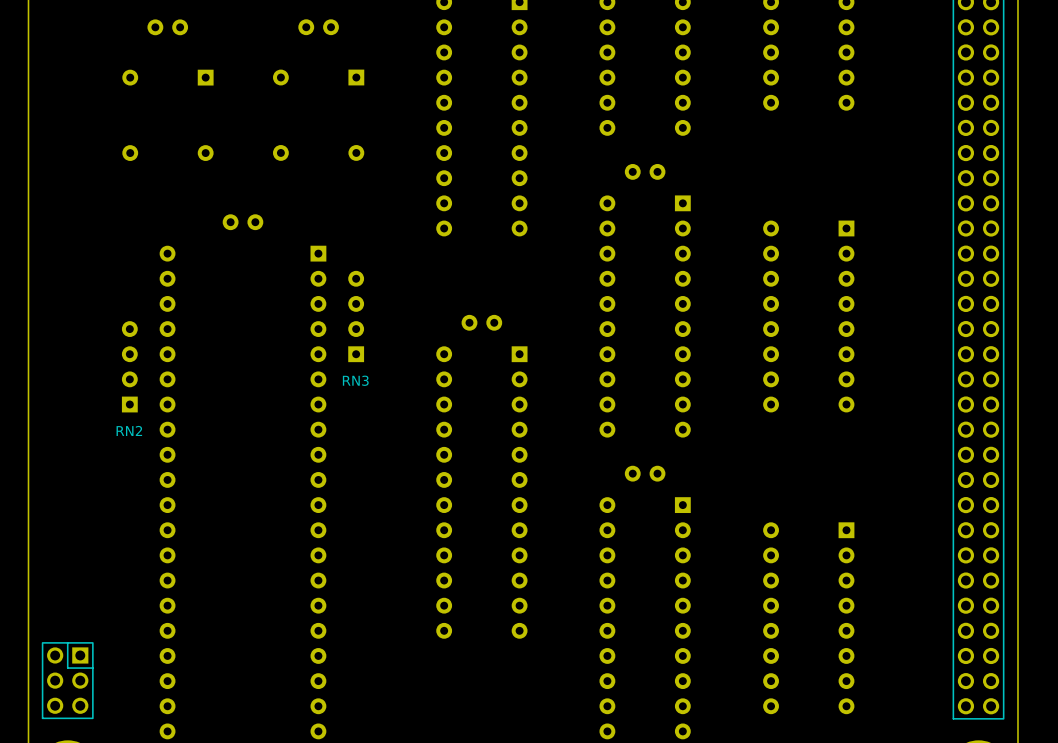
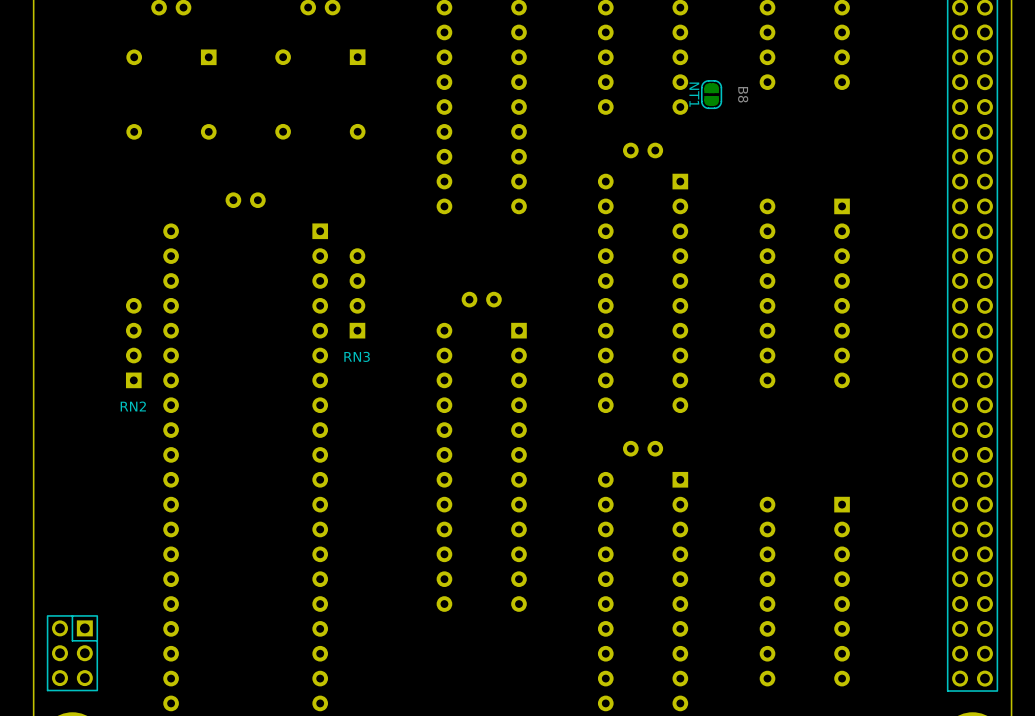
NT1: none -> B8 (711, 94)

